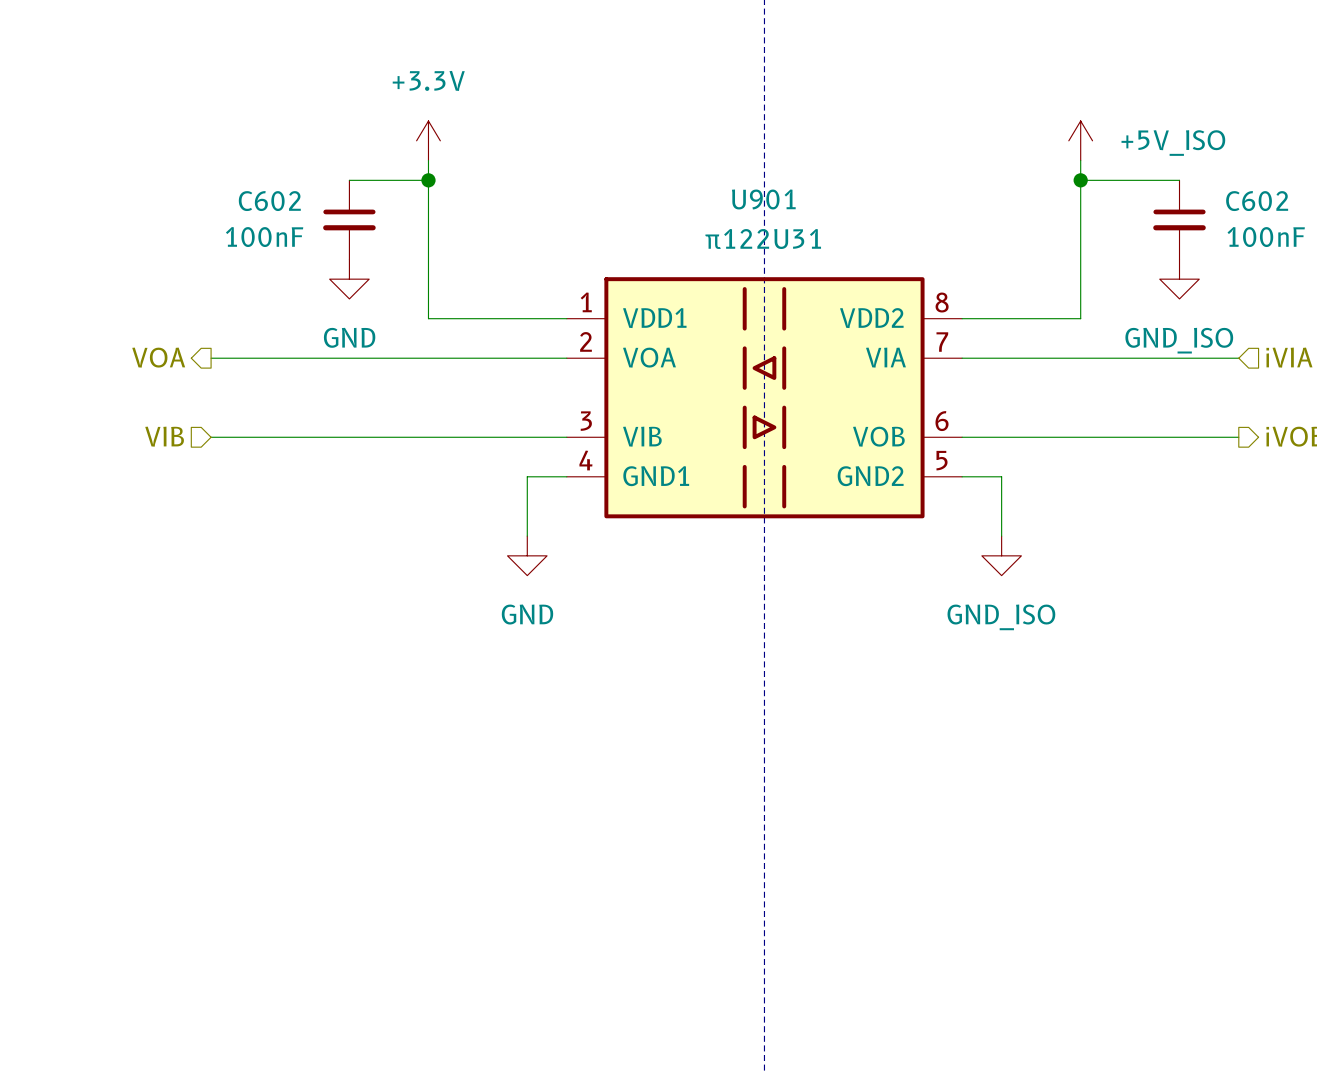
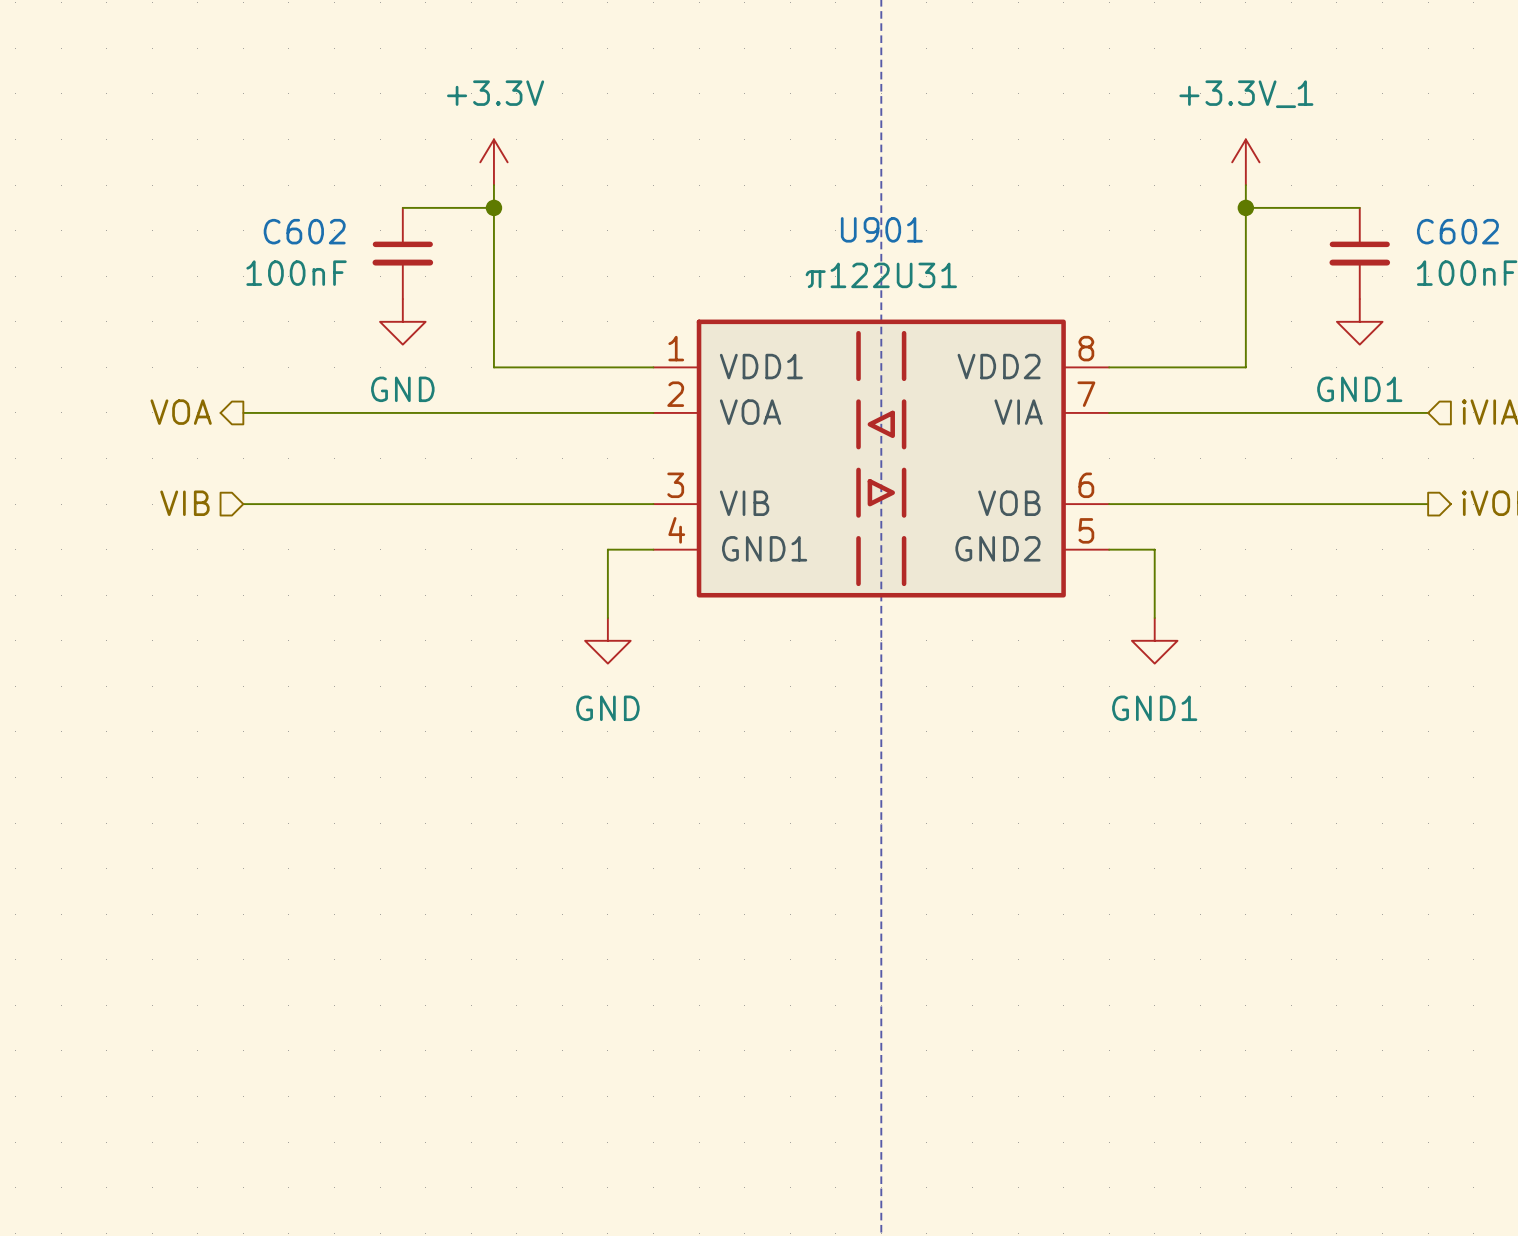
power symbol: +5V_ISO (1080, 140) -> +3.3V_1 (1245, 162)
power symbol: GND_ISO (1179, 279) -> GND1 (1359, 321)
power symbol: GND_ISO (1001, 555) -> GND1 (1154, 640)

